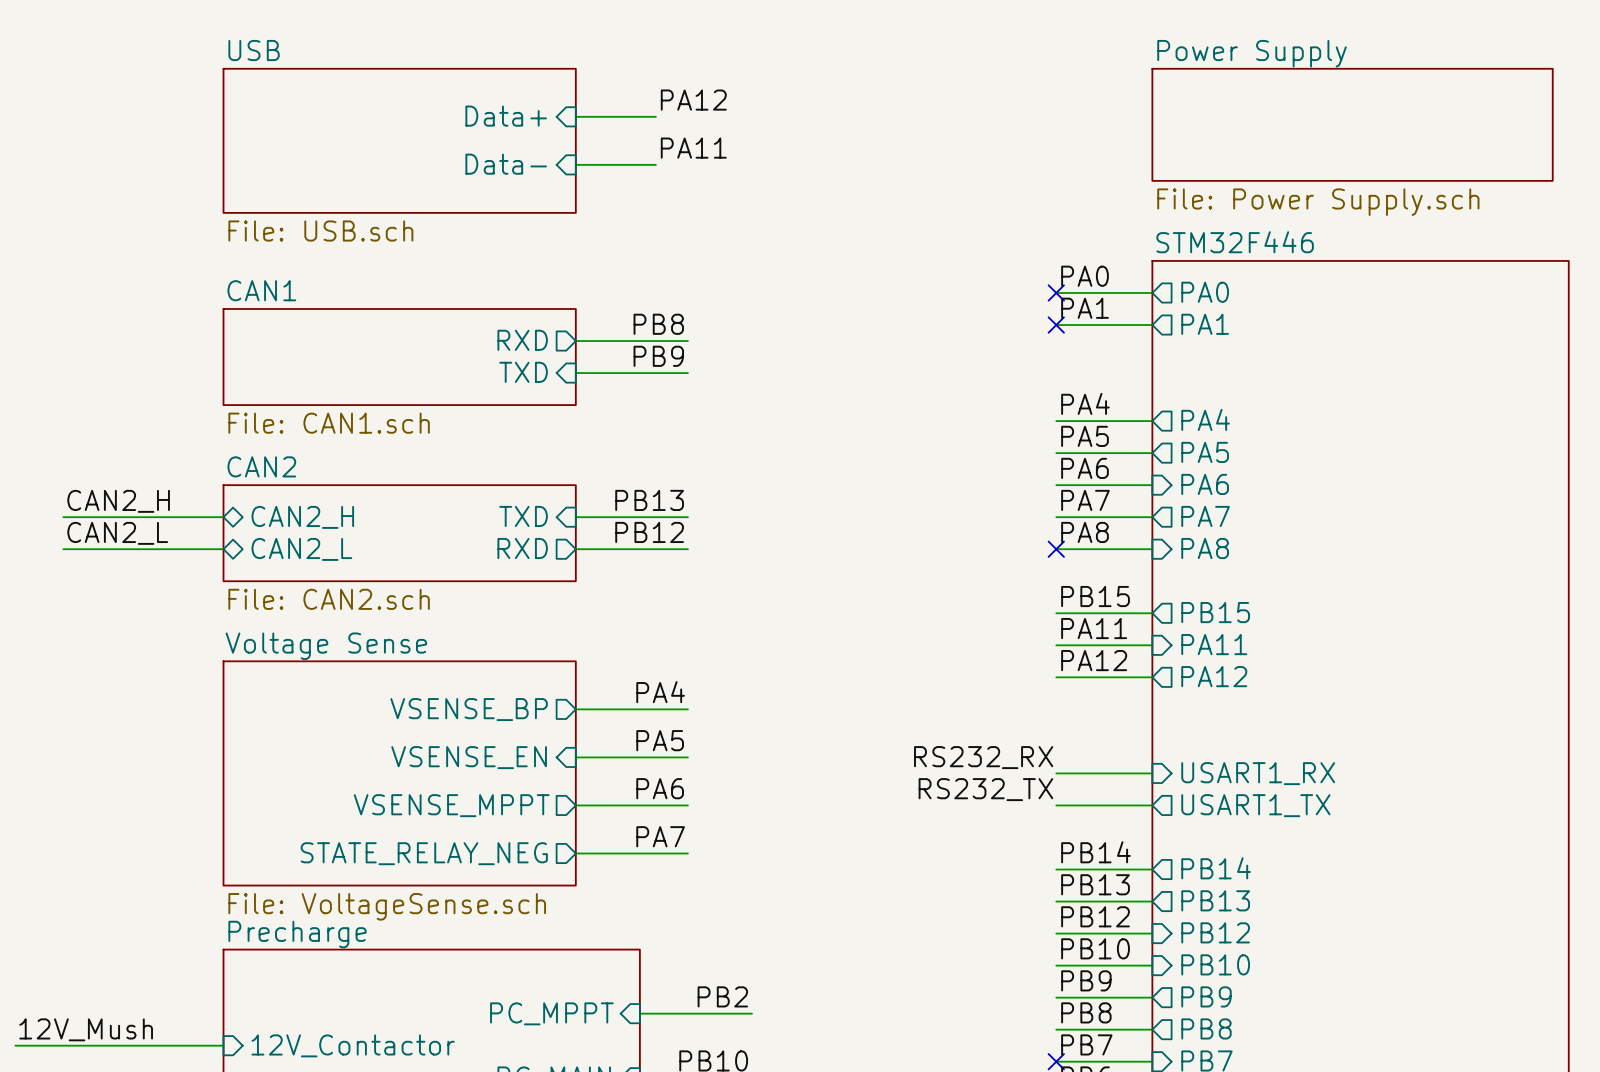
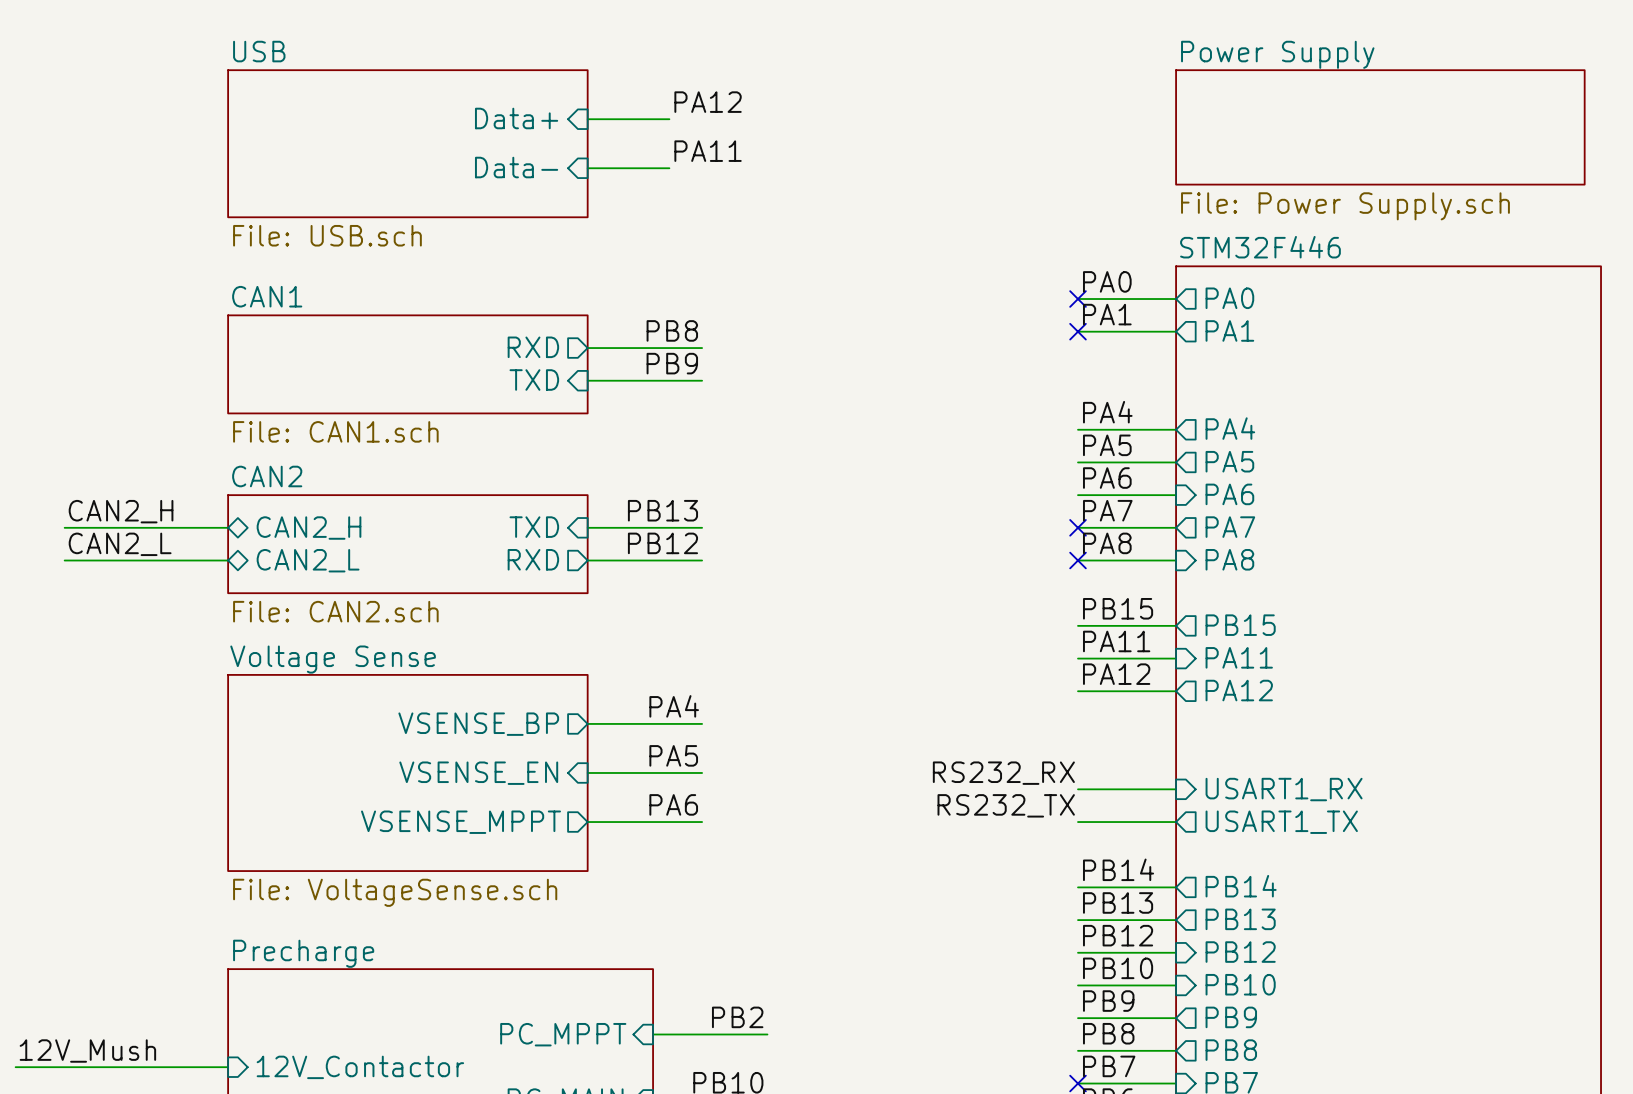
no-connect mark: none -> (1078, 527)
sheet Voltage Sense: none -> File: VoltageSense.sch (407, 772)
sheet Voltage Sense: File: VoltageSense.sch (399, 773) -> none
label: PA7 (660, 836) -> none
sheet pin: STATE_RELAY_NEG (424, 853) -> none
wire: (575, 853) (687, 853) -> none

